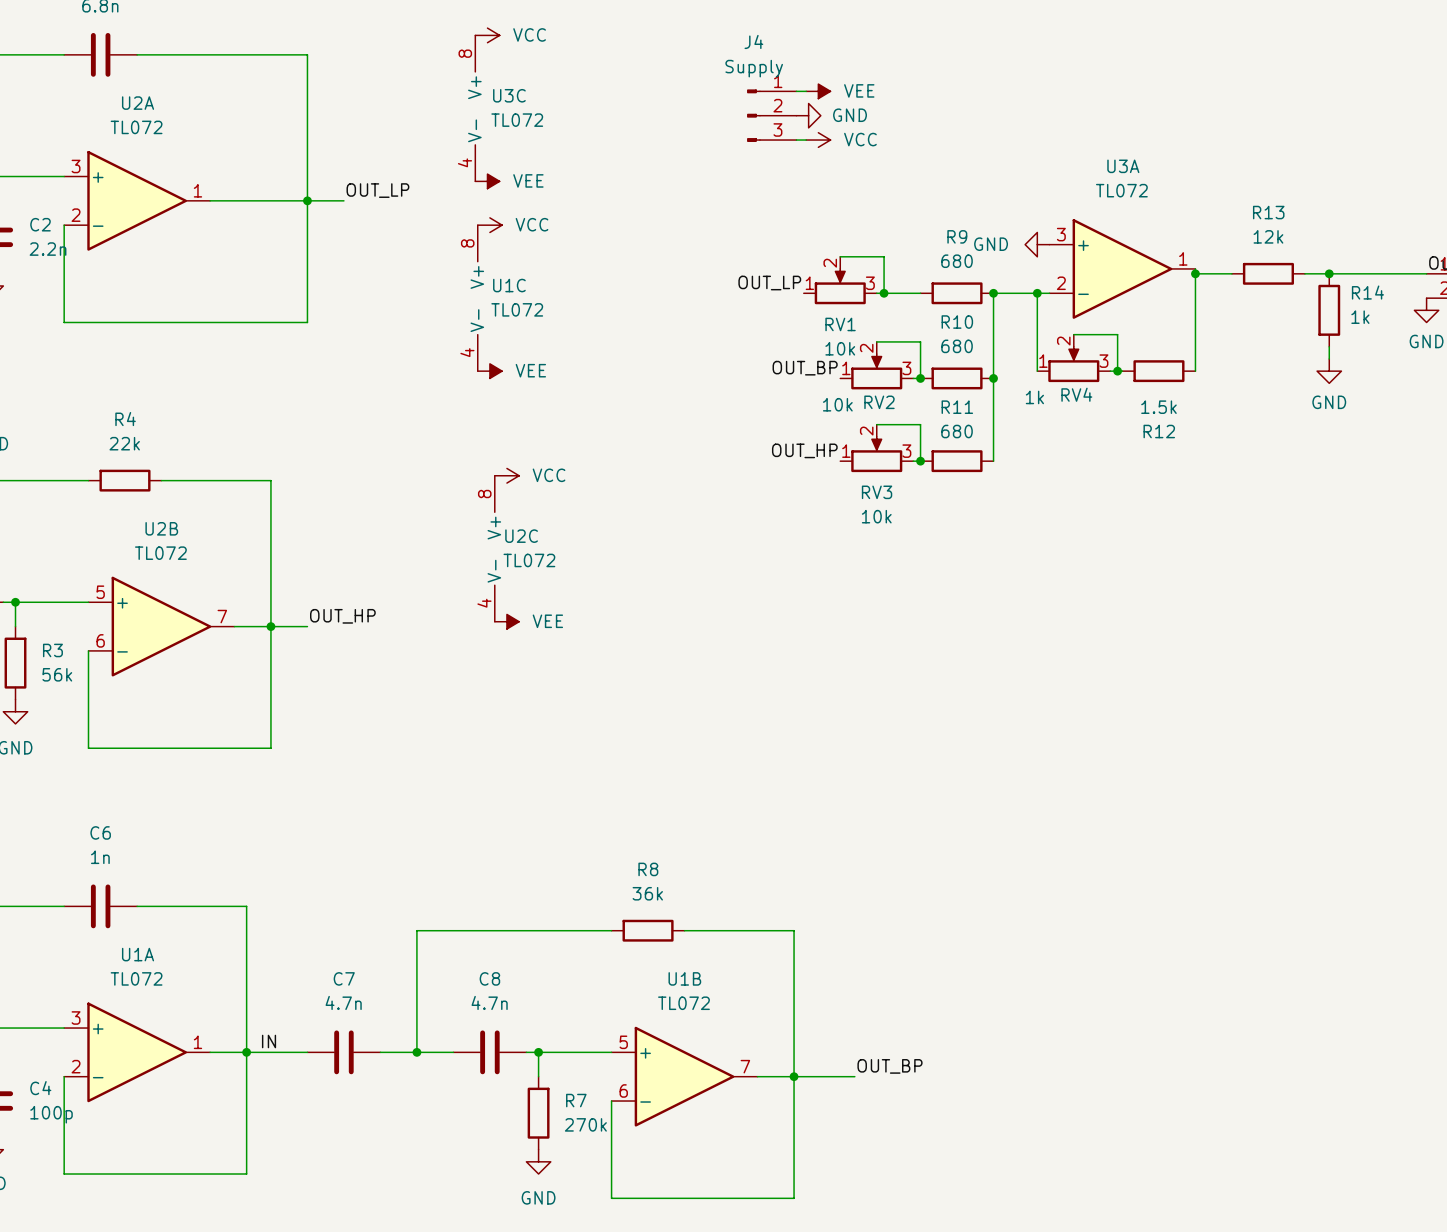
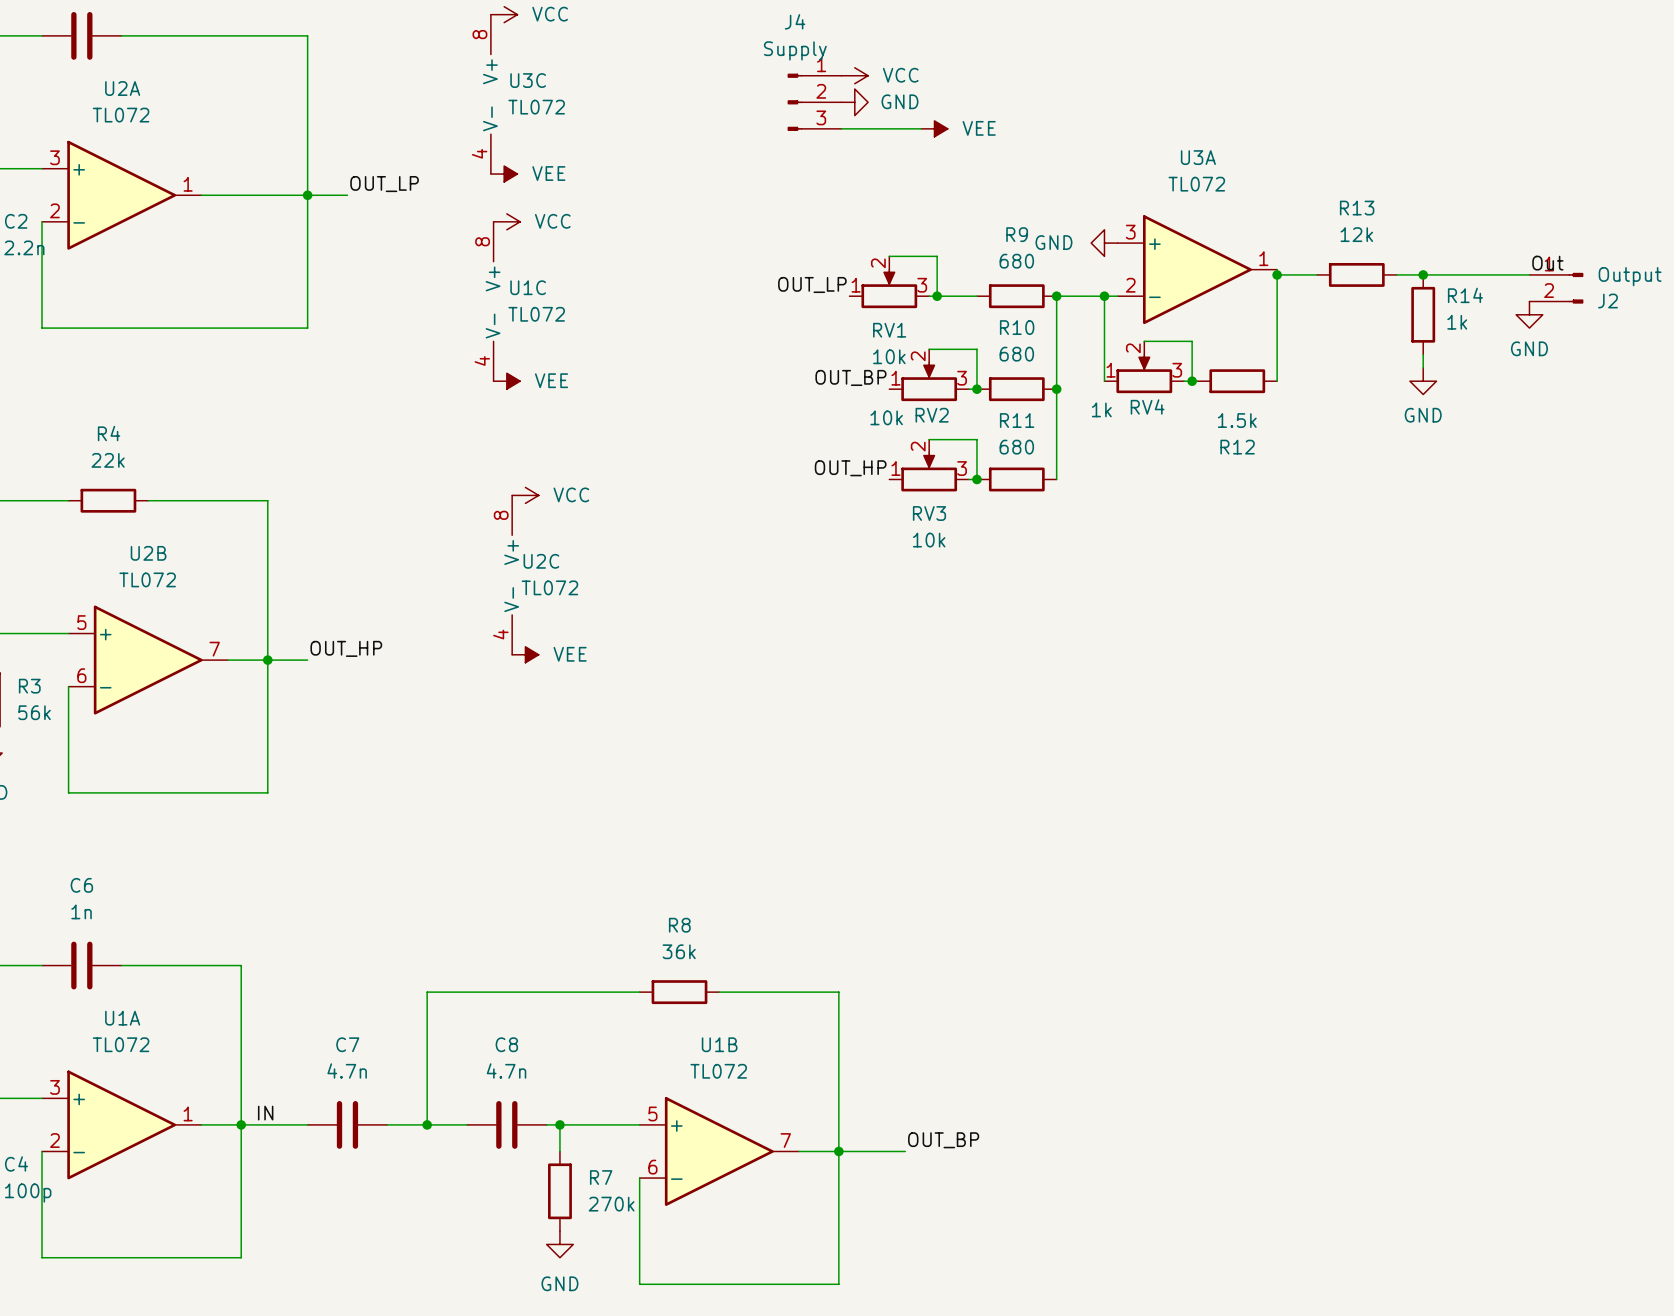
power symbol position: VEE (818, 91) -> VEE (934, 128)
wire: none -> (852, 128) (921, 128)
power symbol position: VCC (818, 140) -> VCC (854, 75)

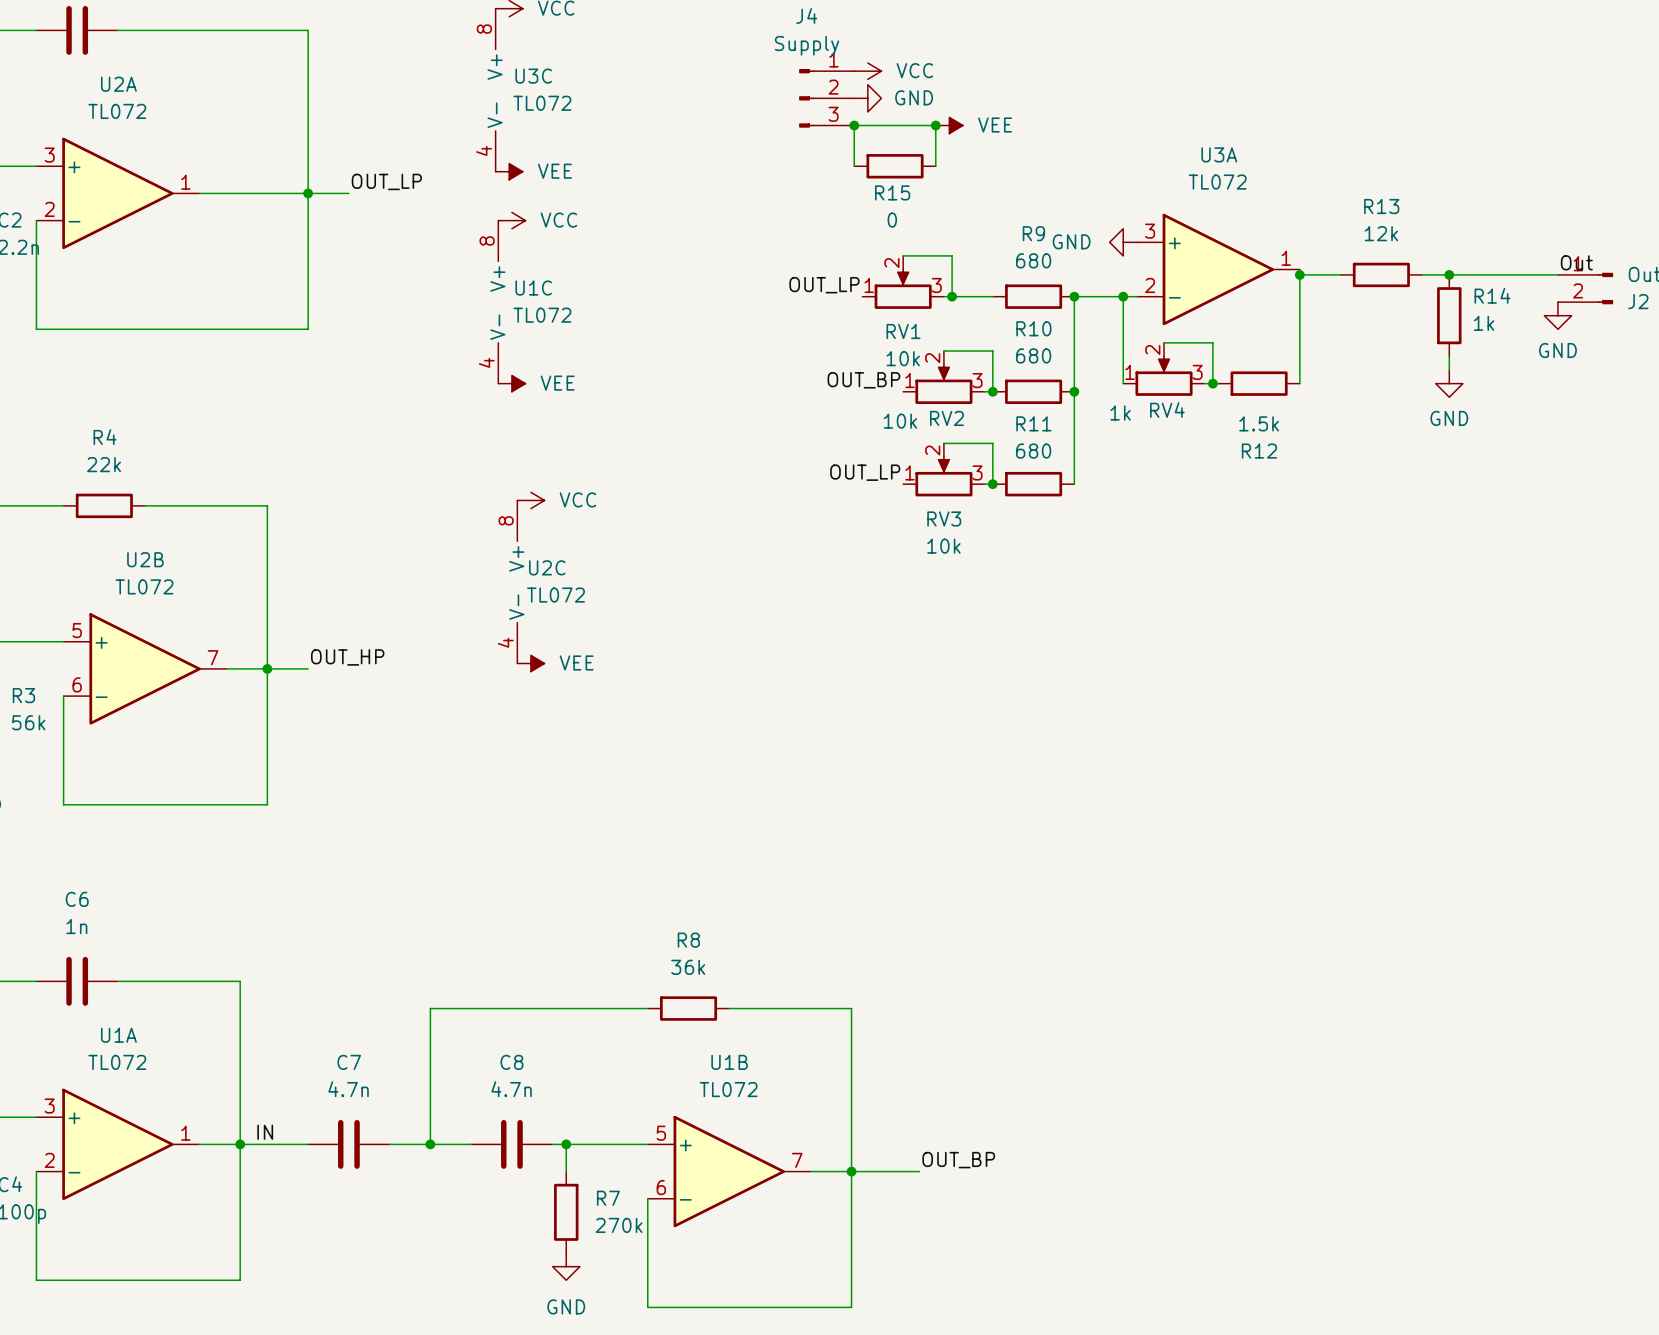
wire: none -> (854, 125) (854, 166)
junction: none -> (854, 125)
wire: none -> (935, 125) (935, 166)
junction: none -> (935, 125)
R15: none -> 0 (895, 166)
label: OUT_HP (850, 468) -> OUT_LP (865, 472)

